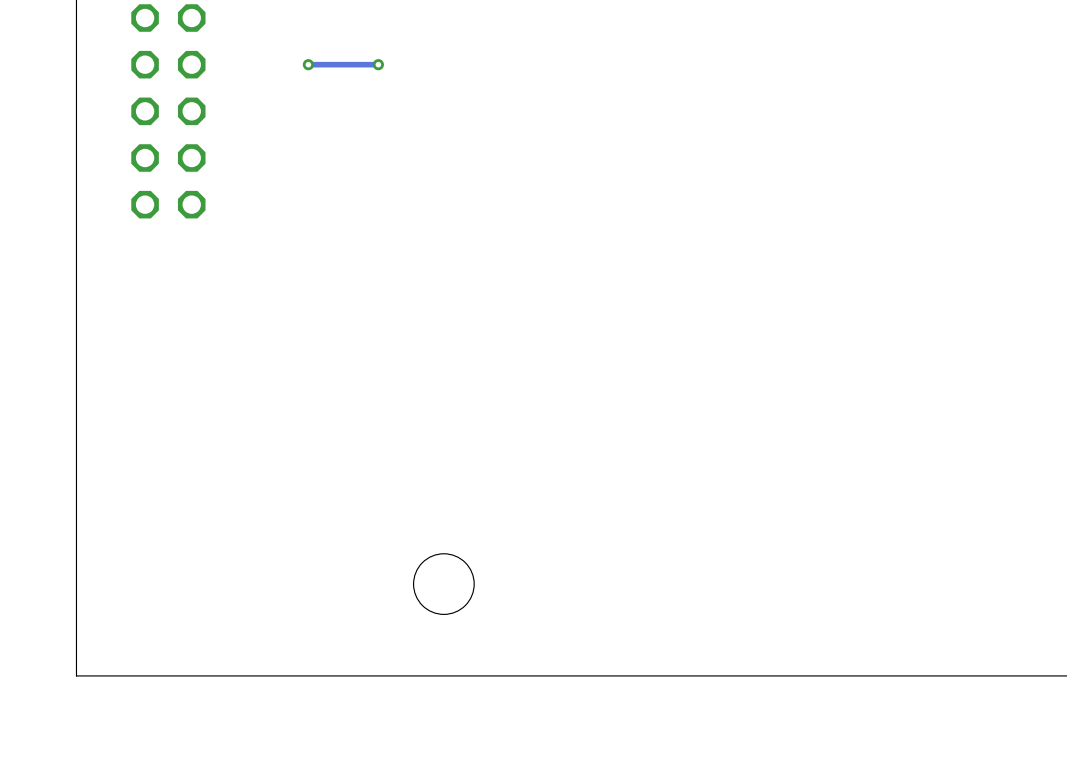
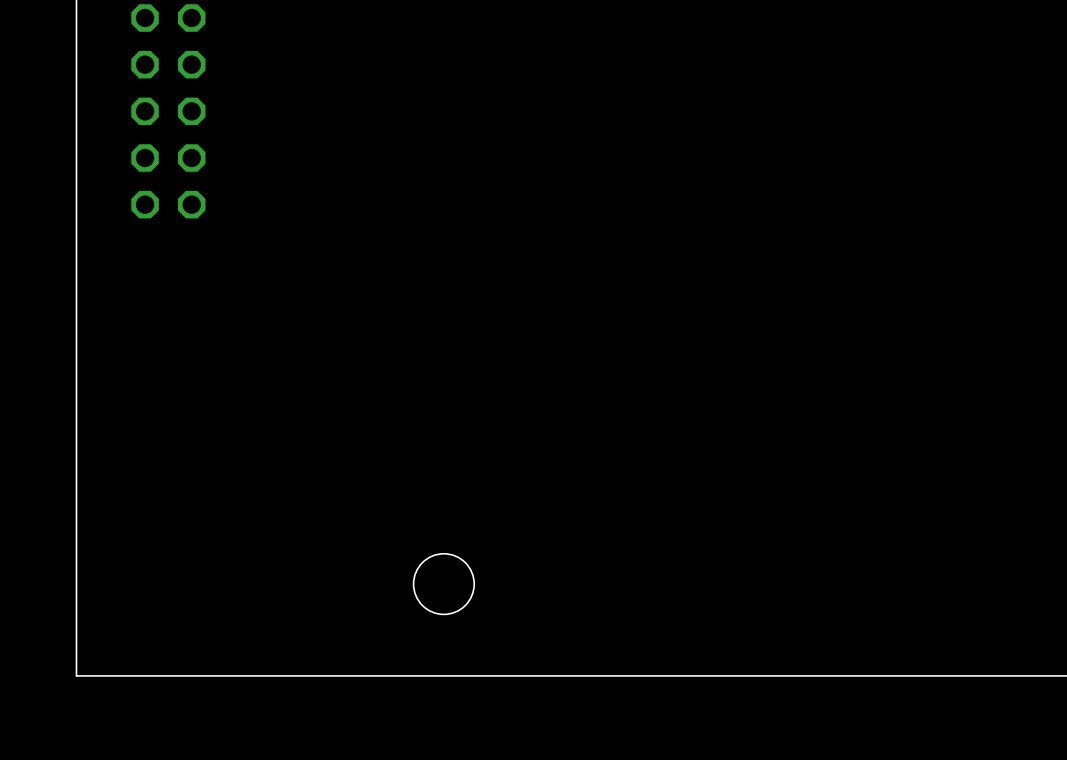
via: (308, 64) -> none
track: (378, 64) (308, 64) -> none
via: (378, 64) -> none

